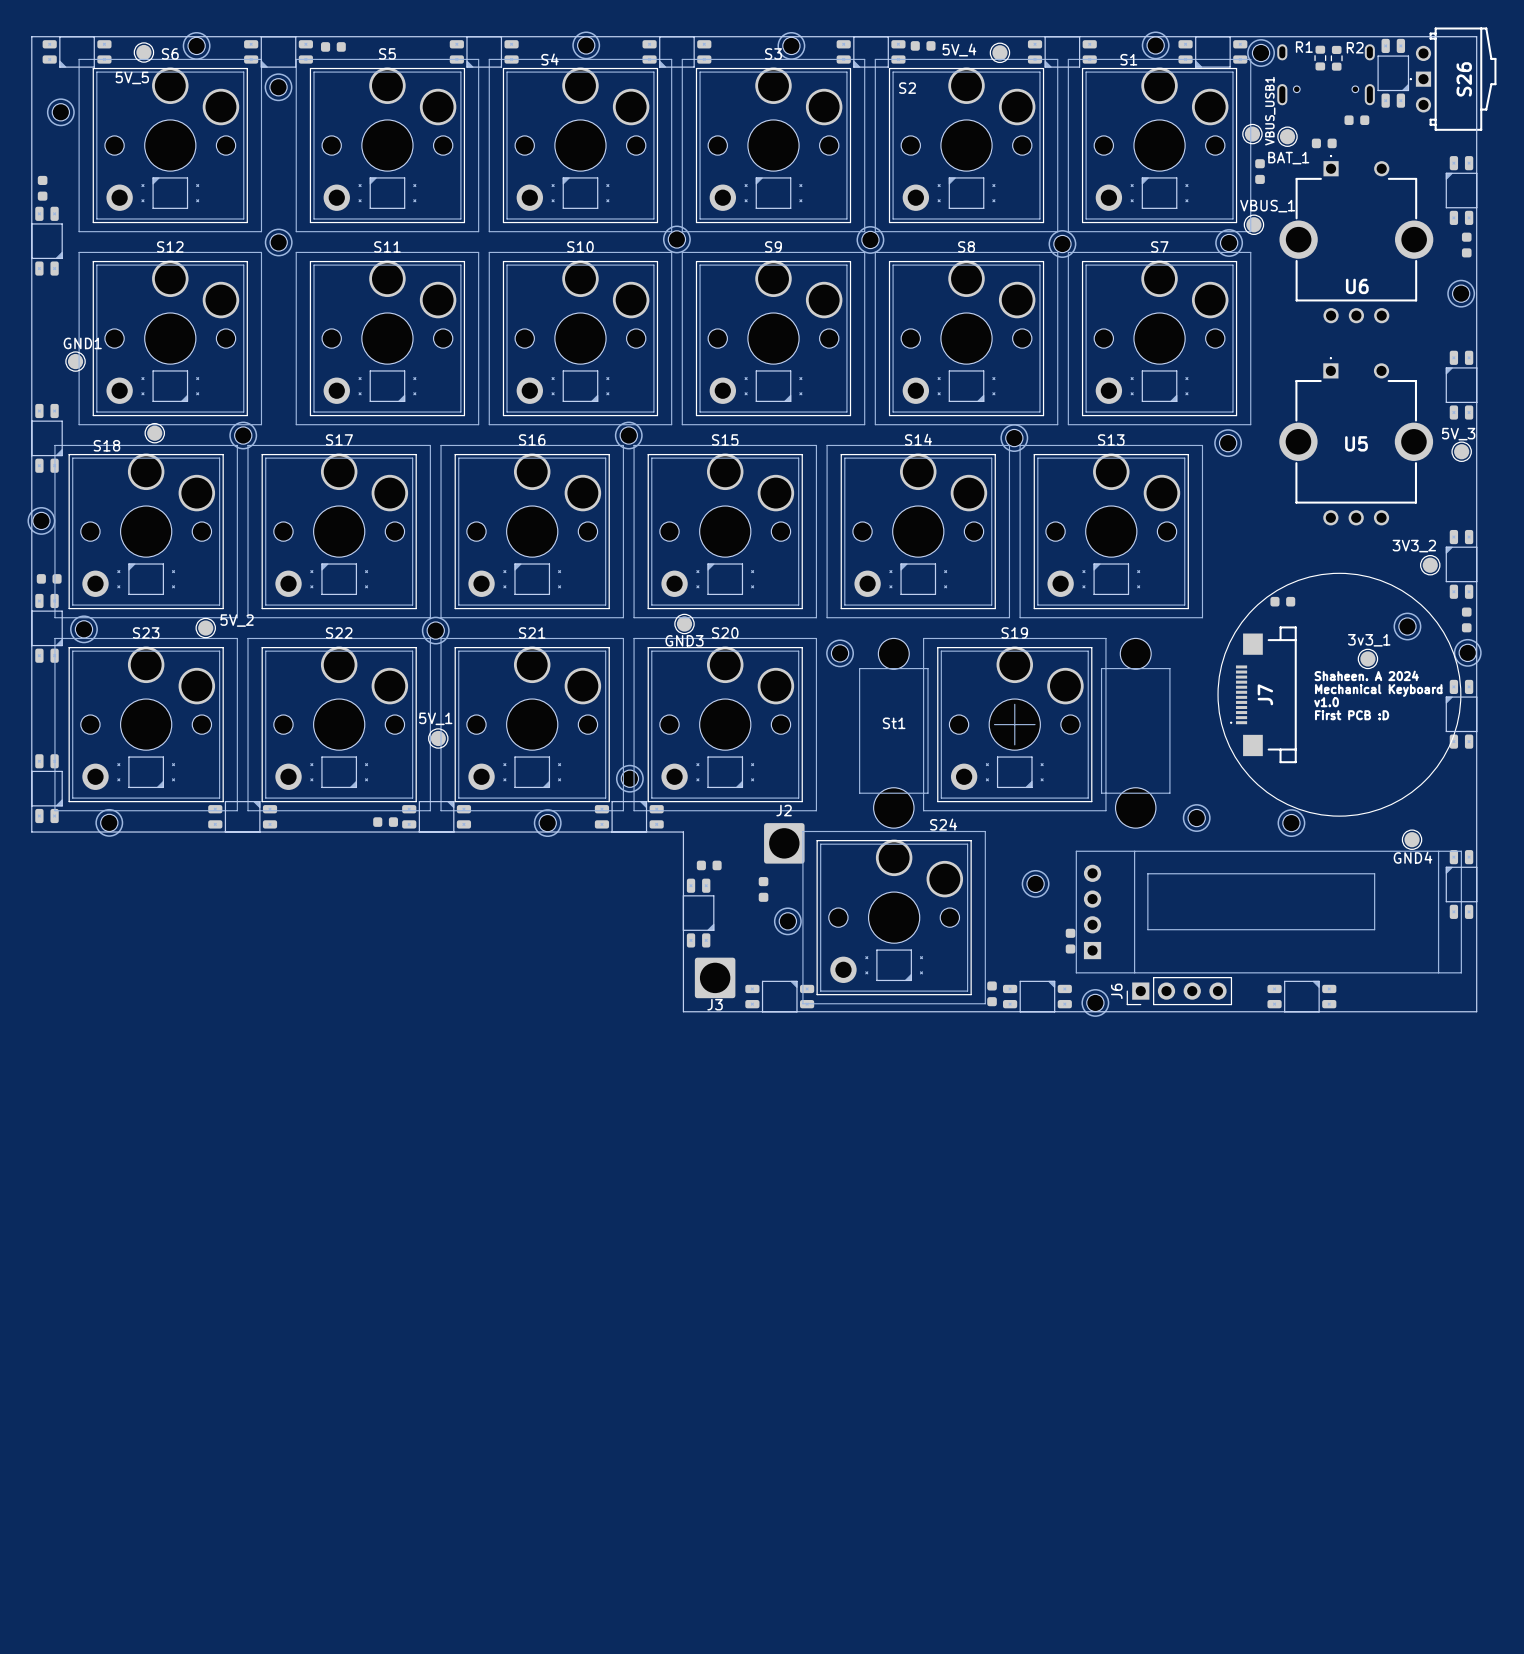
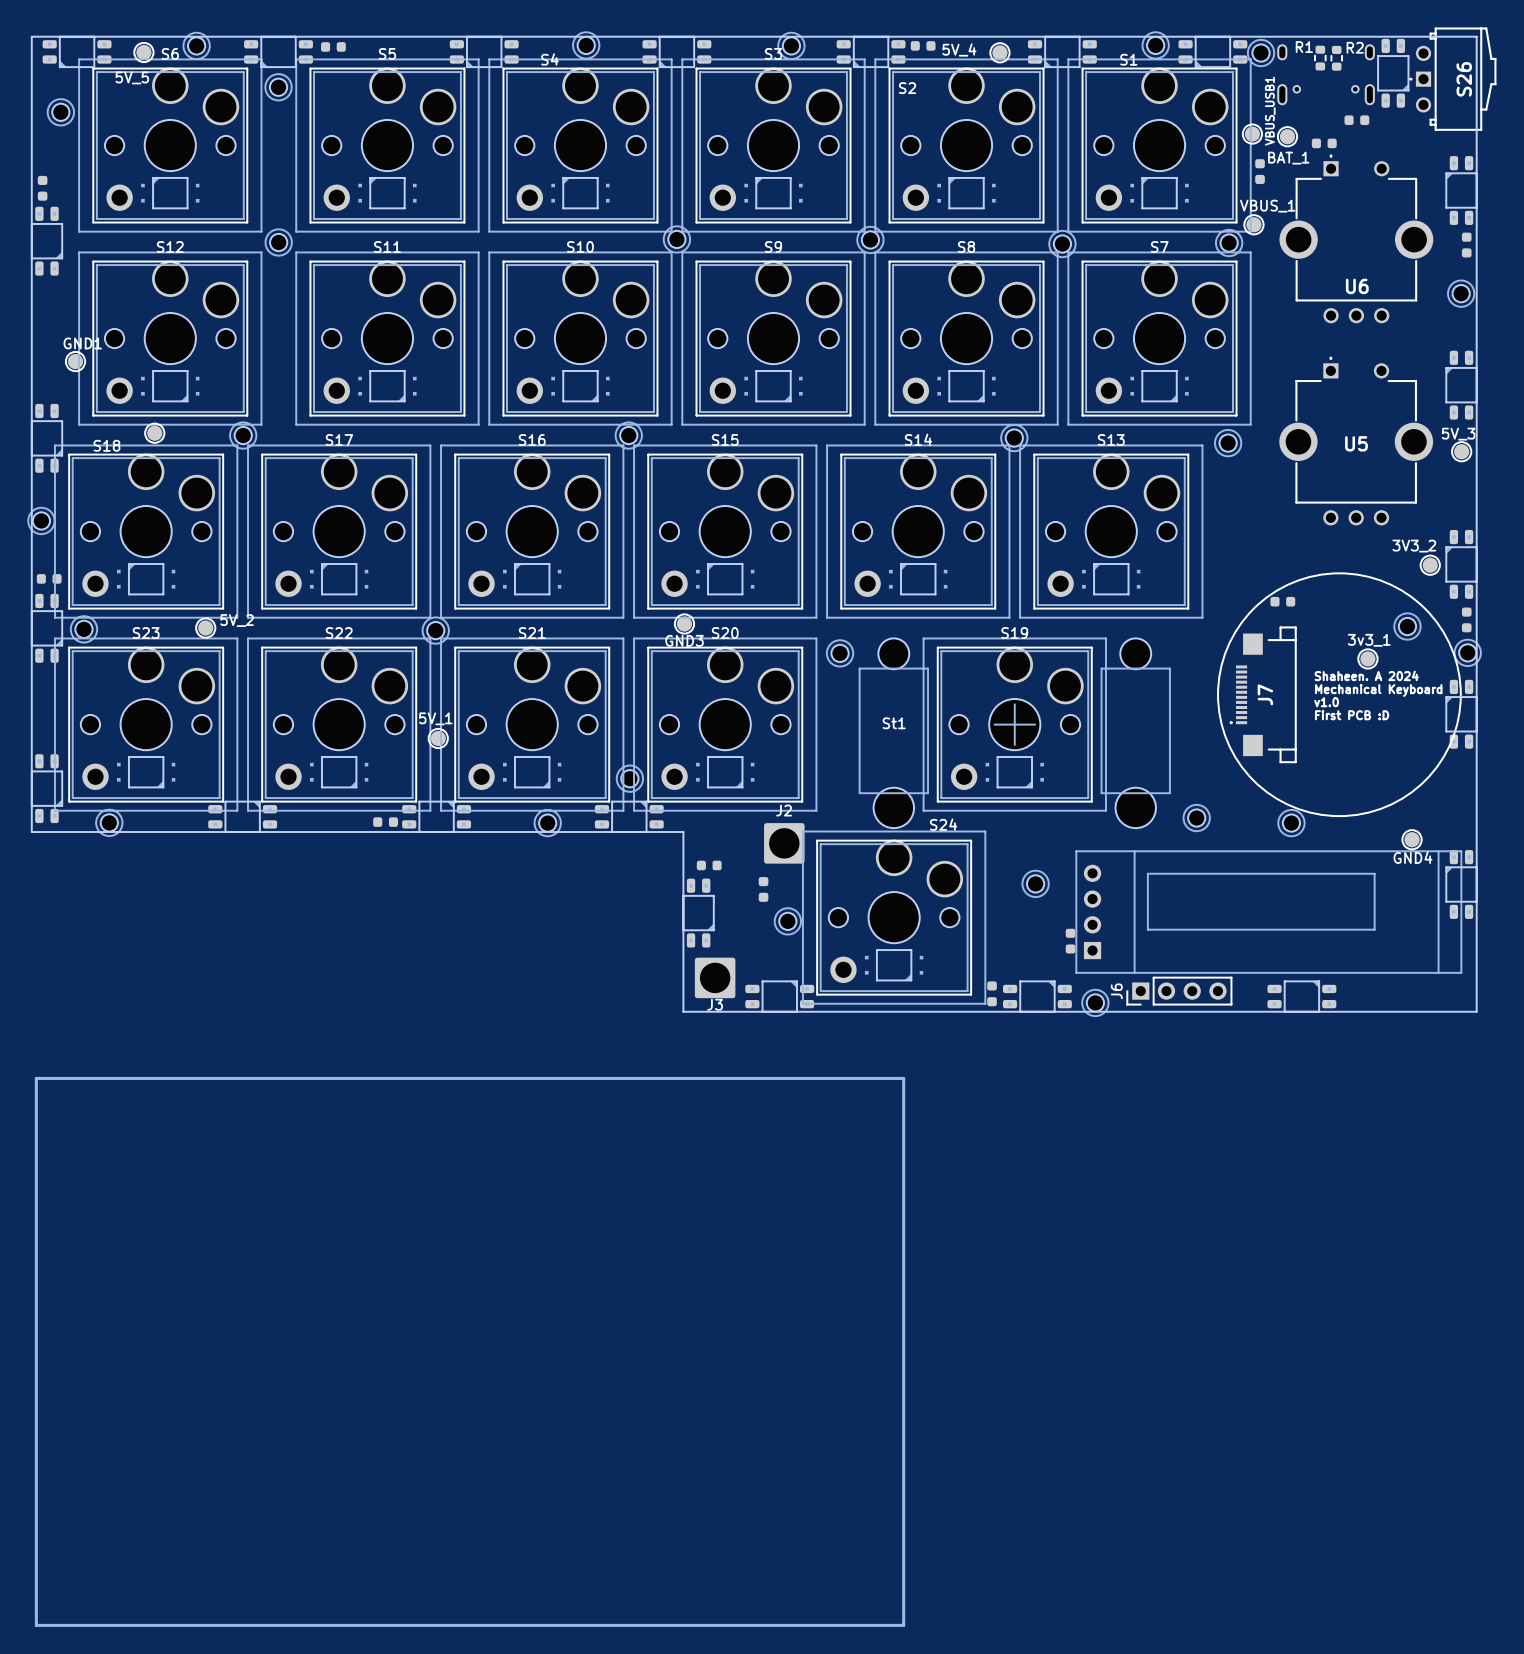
line: none -> (36, 1078) (903, 1078) (903, 1625) (36, 1625) (36, 1078)

